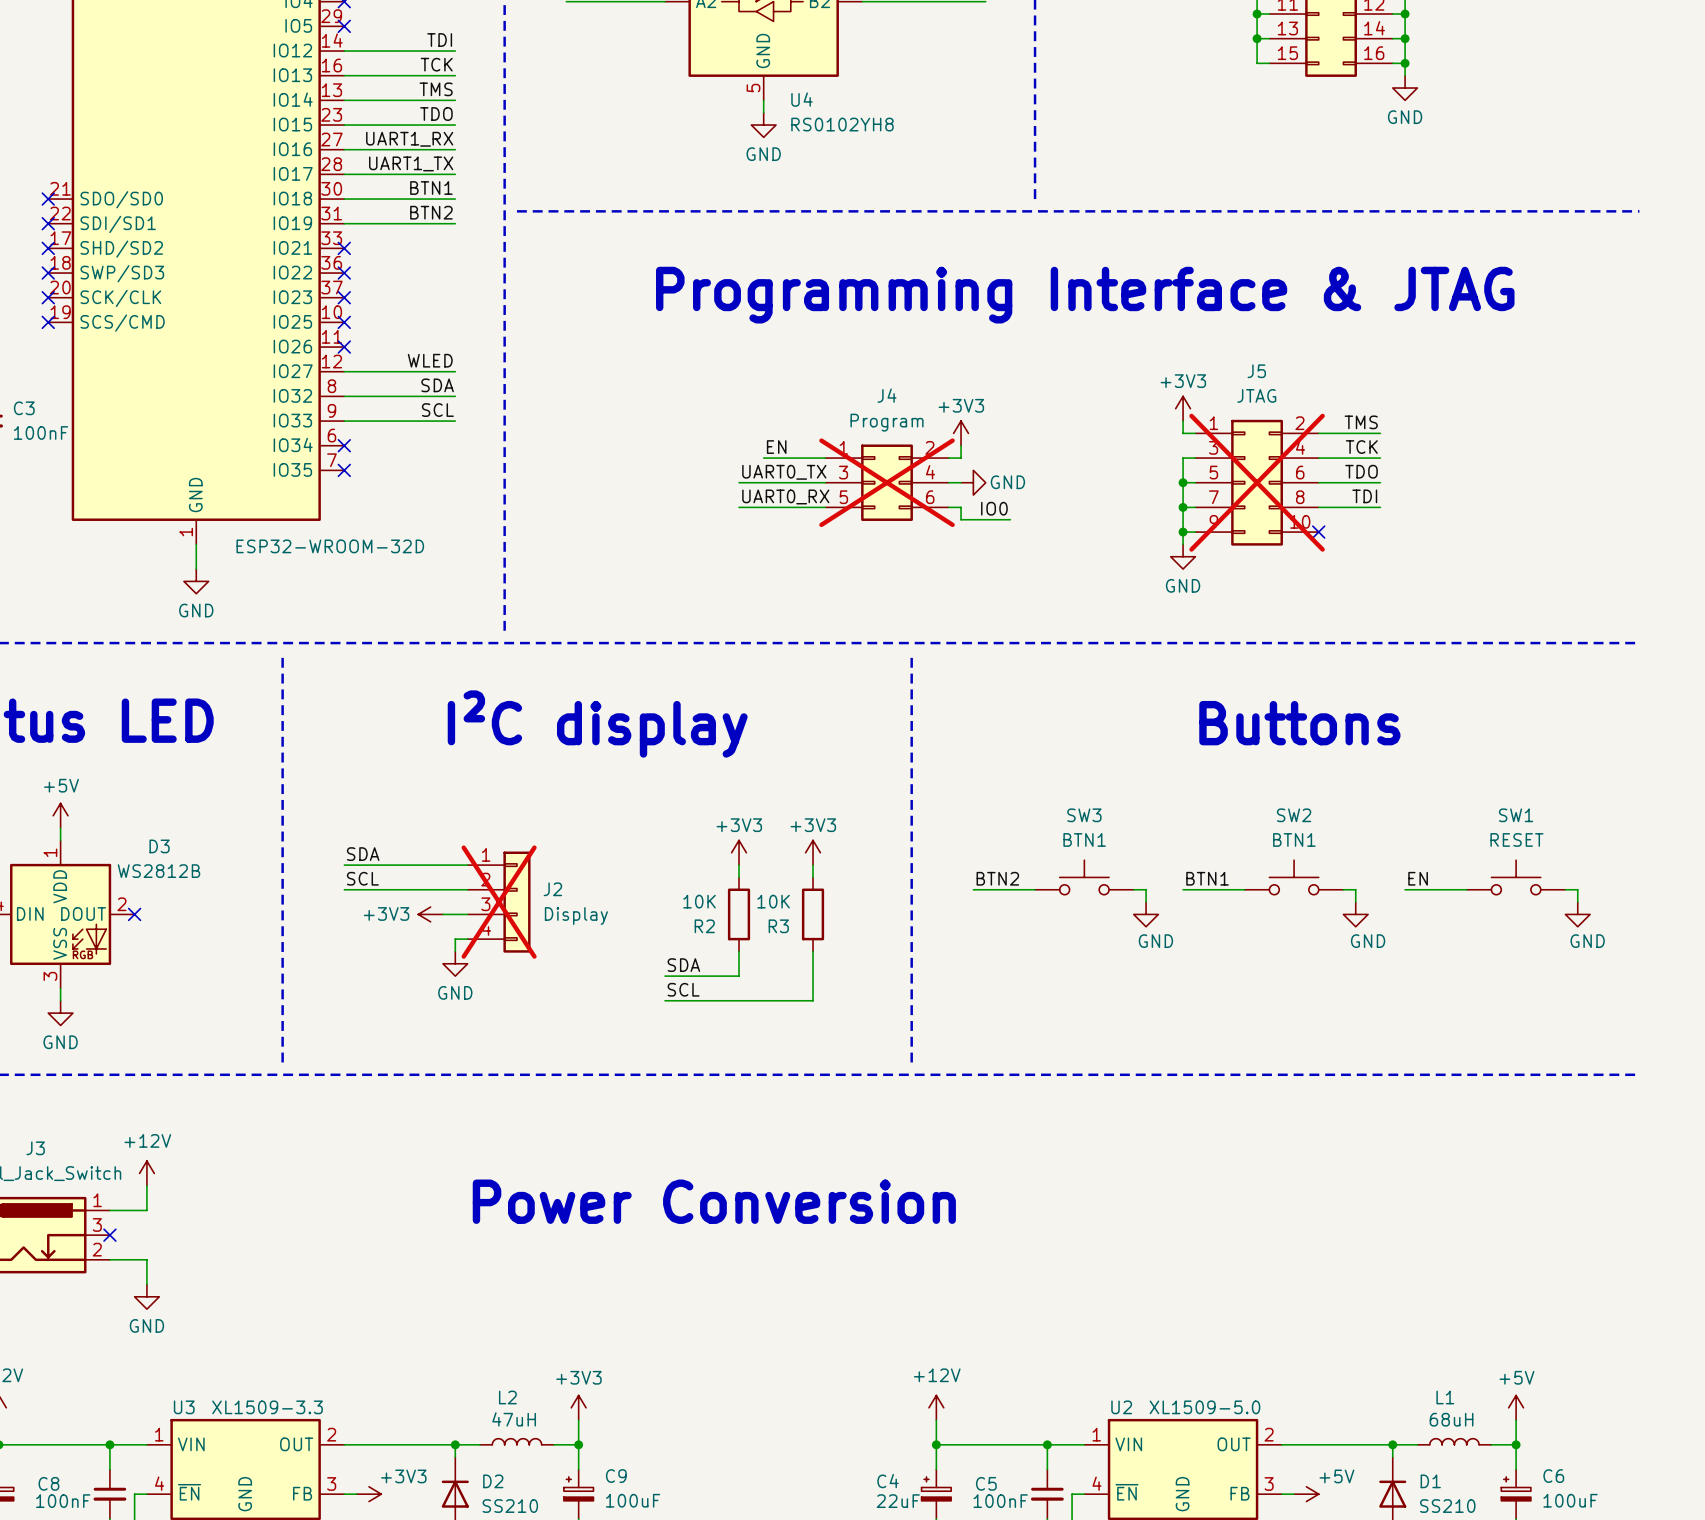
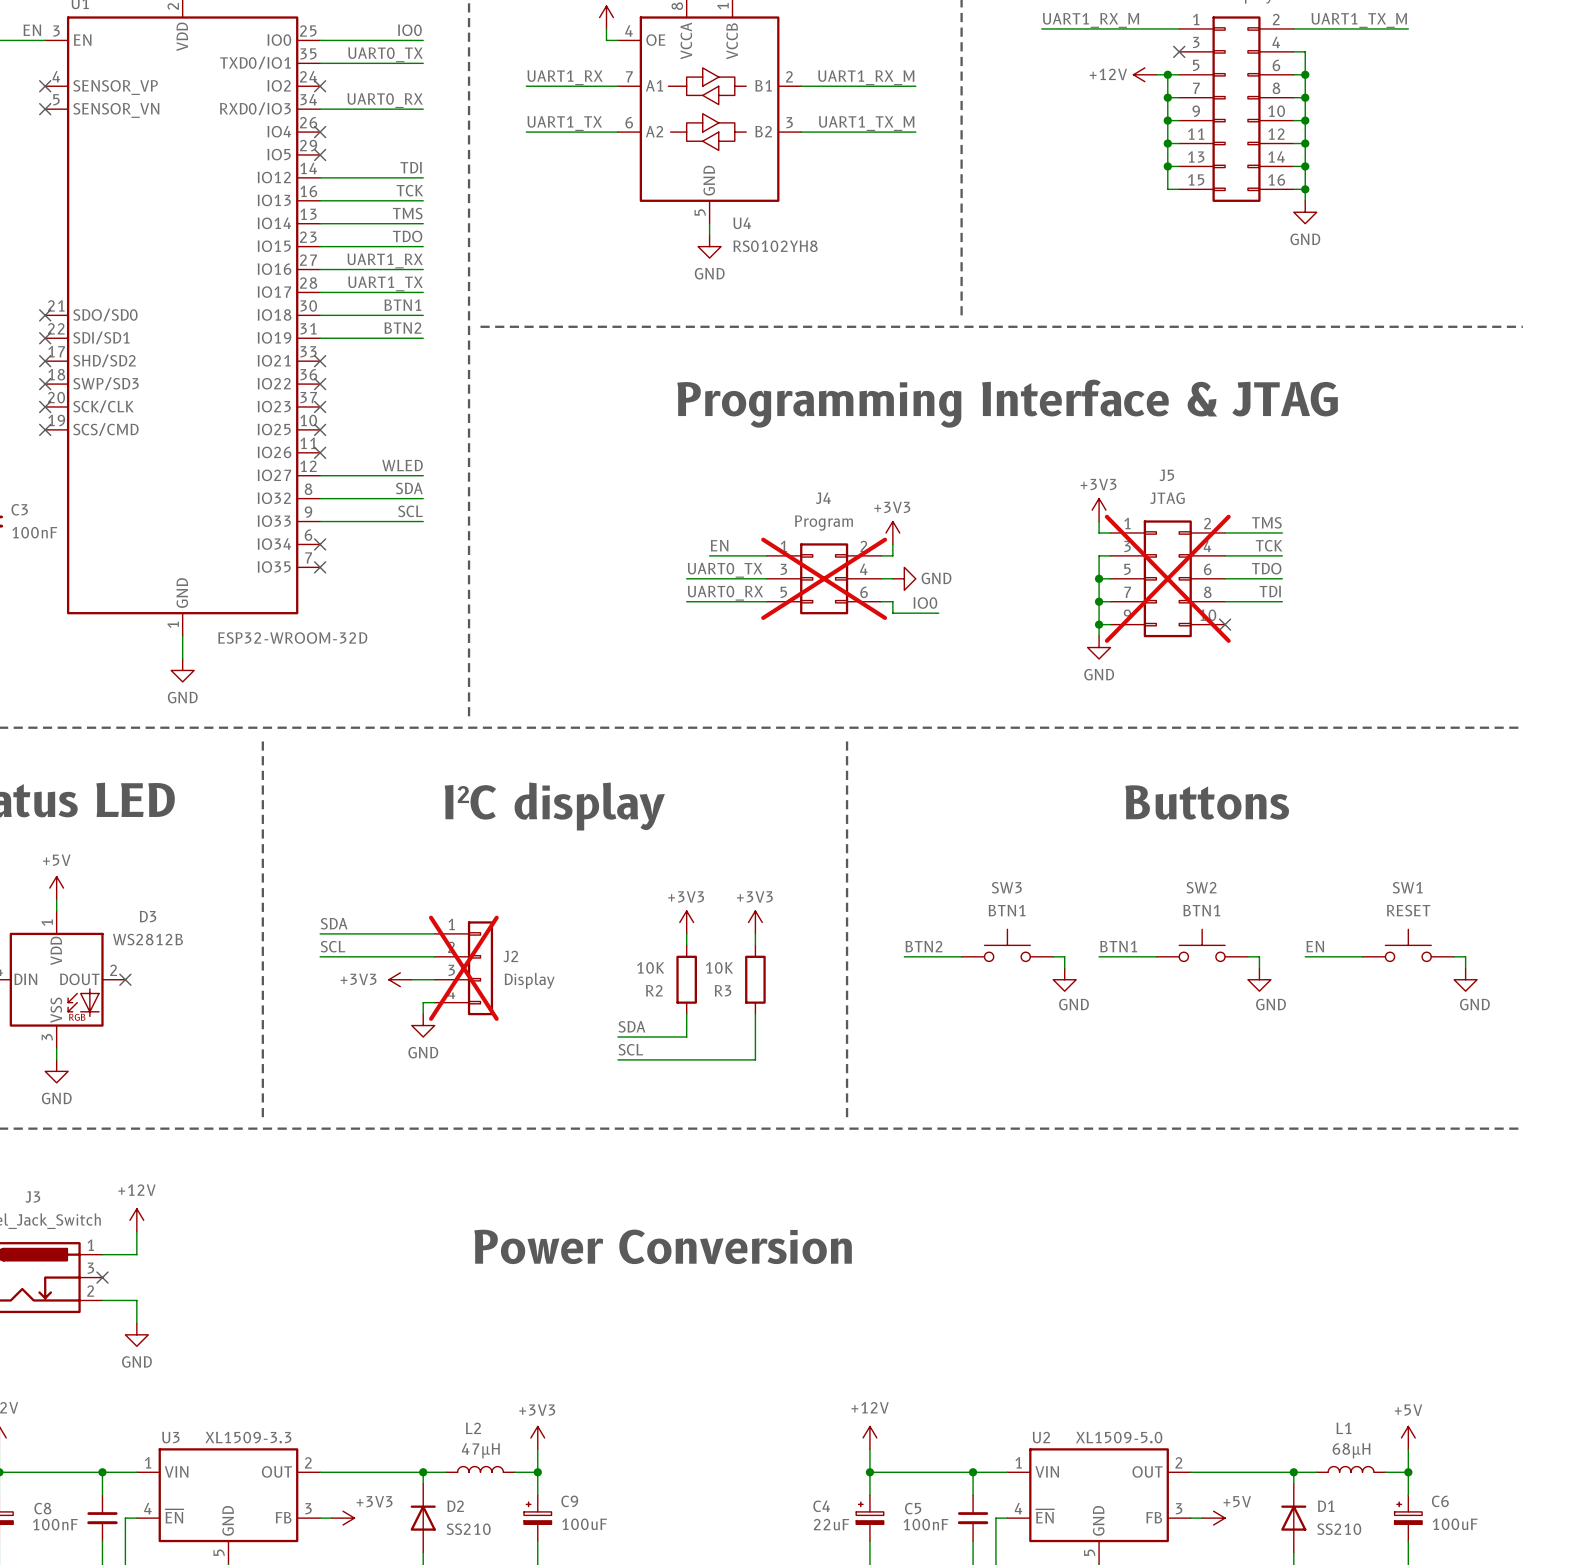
L2 value: 47uH (514, 1419) -> 47µH (480, 1450)
L1 value: 68uH (1451, 1419) -> 68µH (1351, 1450)

